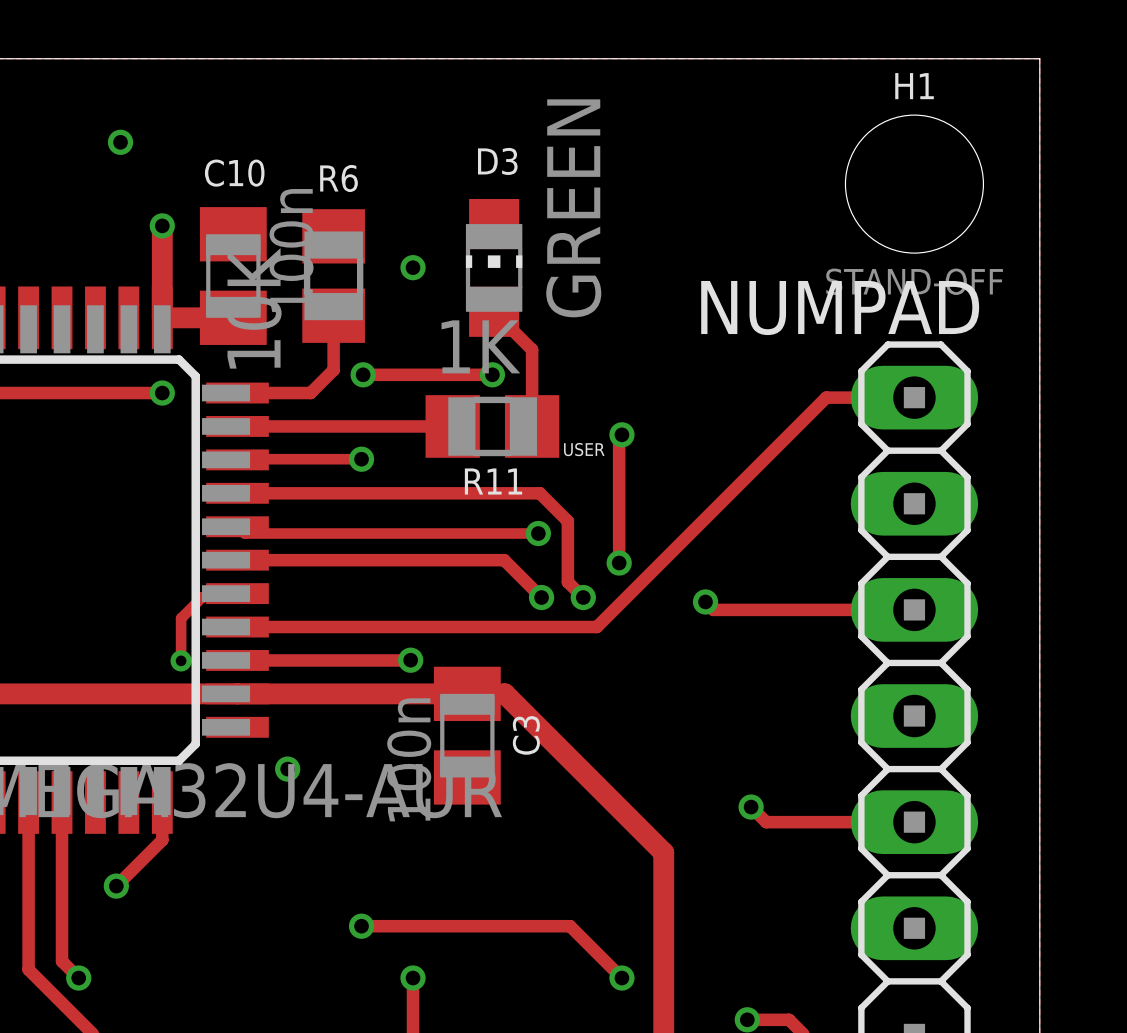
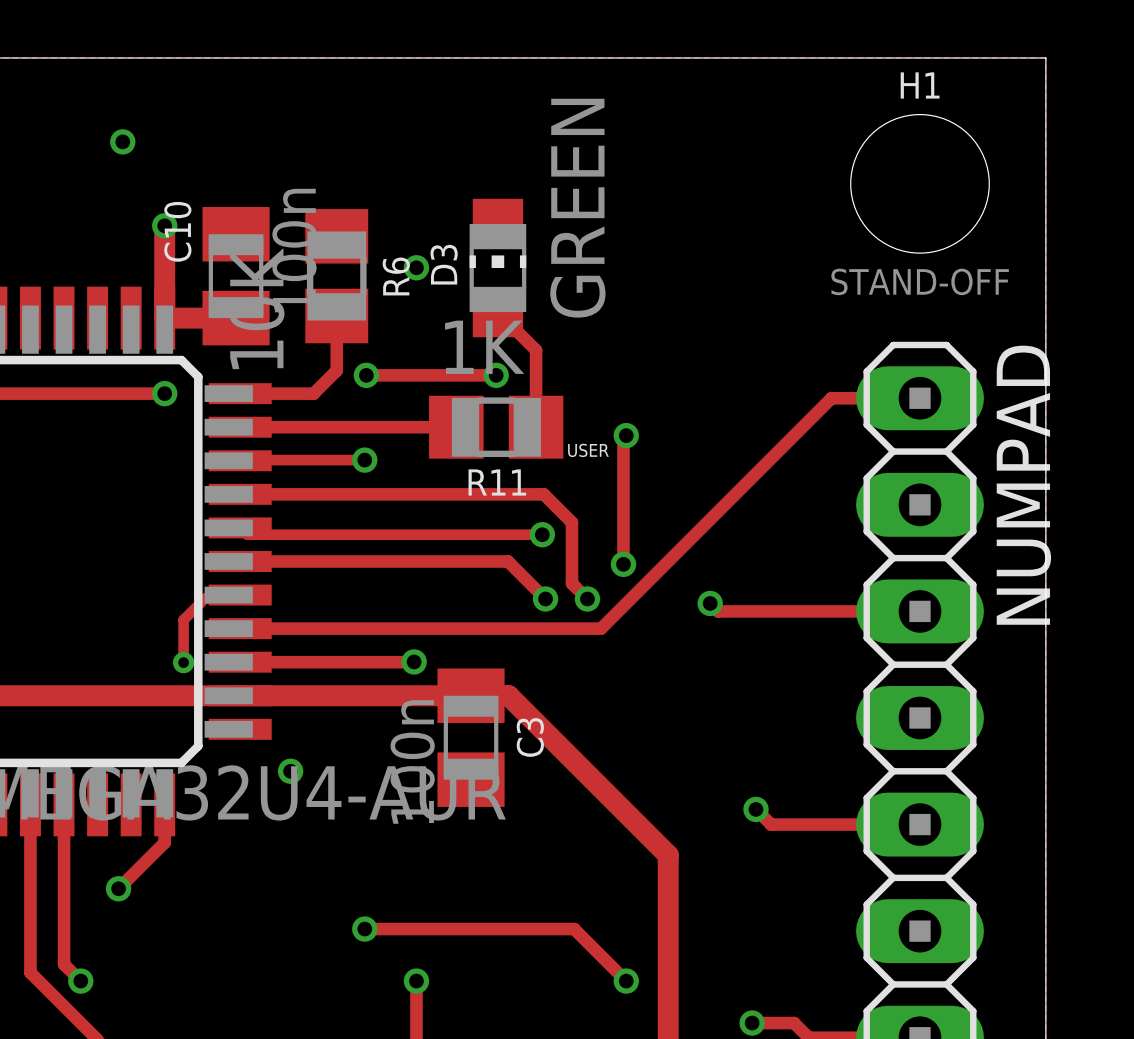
D3 name rotation: 0° (497, 161) -> 90° counterclockwise (444, 264)
D3 name position: D3 (497, 161) -> D3 (444, 264)
C10 name rotation: 0° (234, 173) -> 90° counterclockwise (177, 231)
R6 name rotation: 0° (339, 178) -> 90° counterclockwise (396, 276)
R6 name position: R6 (339, 178) -> R6 (396, 276)
NUMPAD name rotation: 0° (840, 308) -> 90° counterclockwise (1023, 485)

